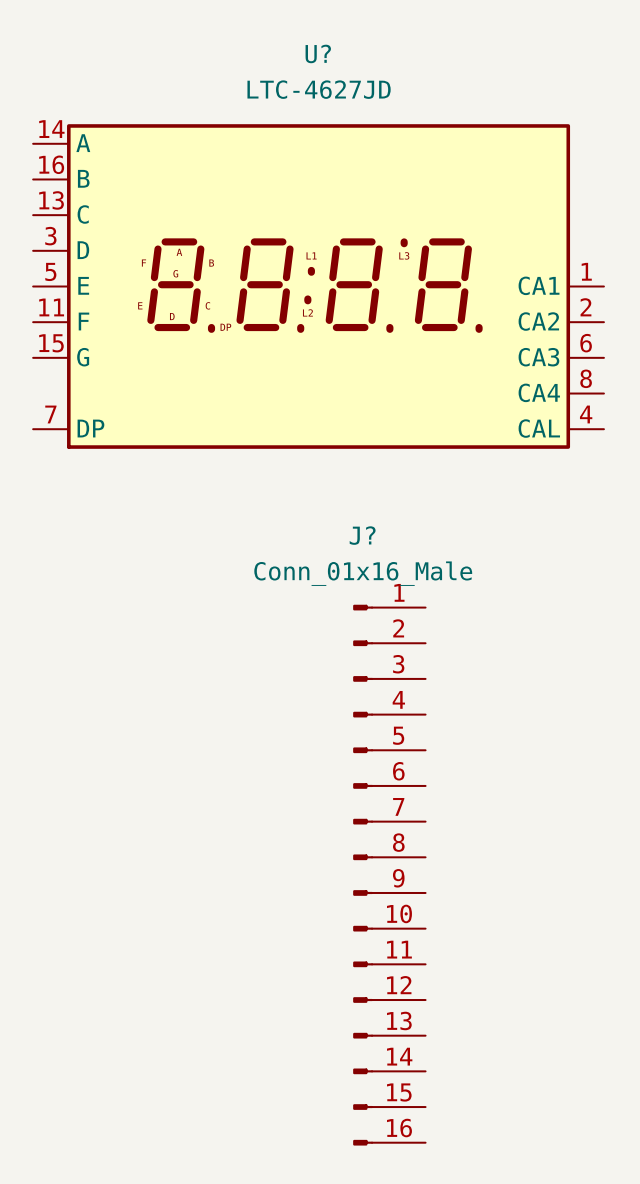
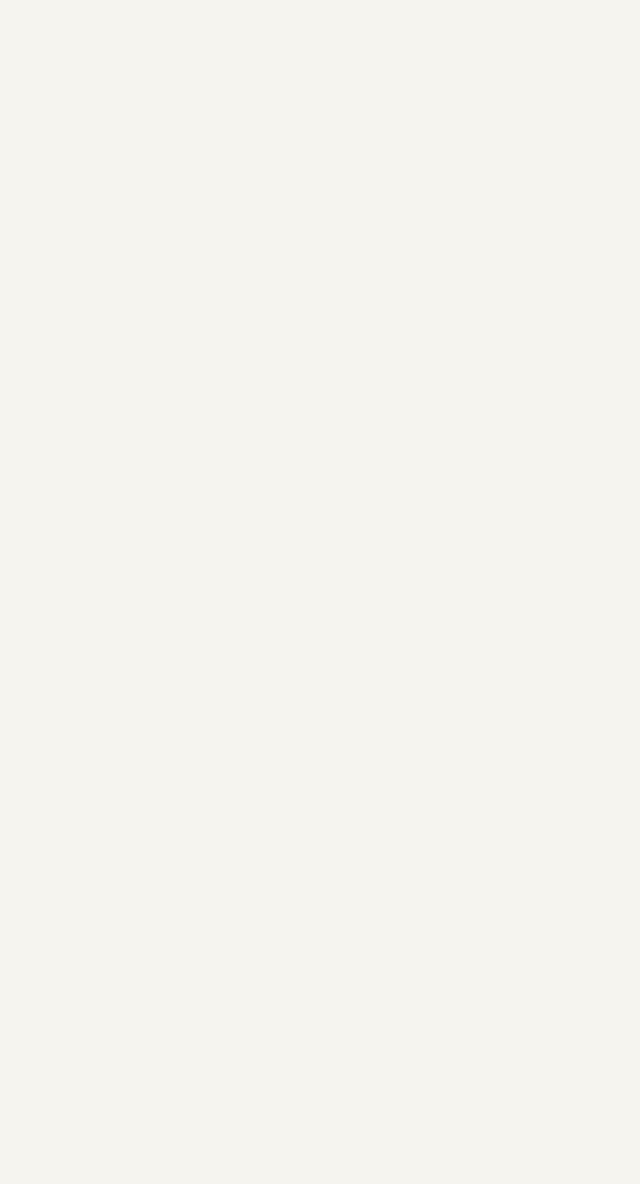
U?: LTC-4627JD (318, 286) -> none
J?: Conn_01x16_Male (389, 875) -> none

